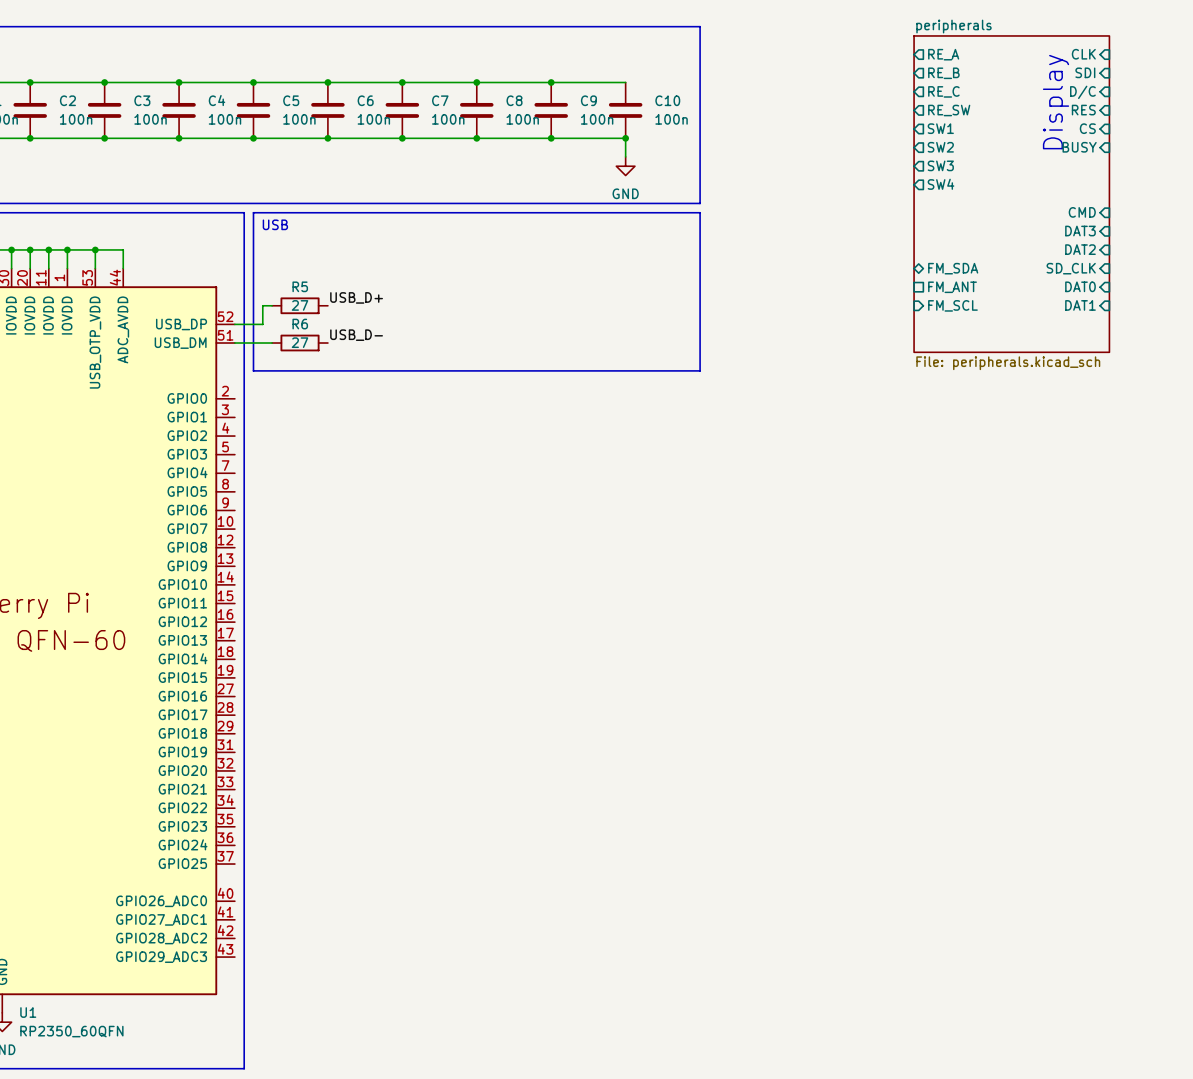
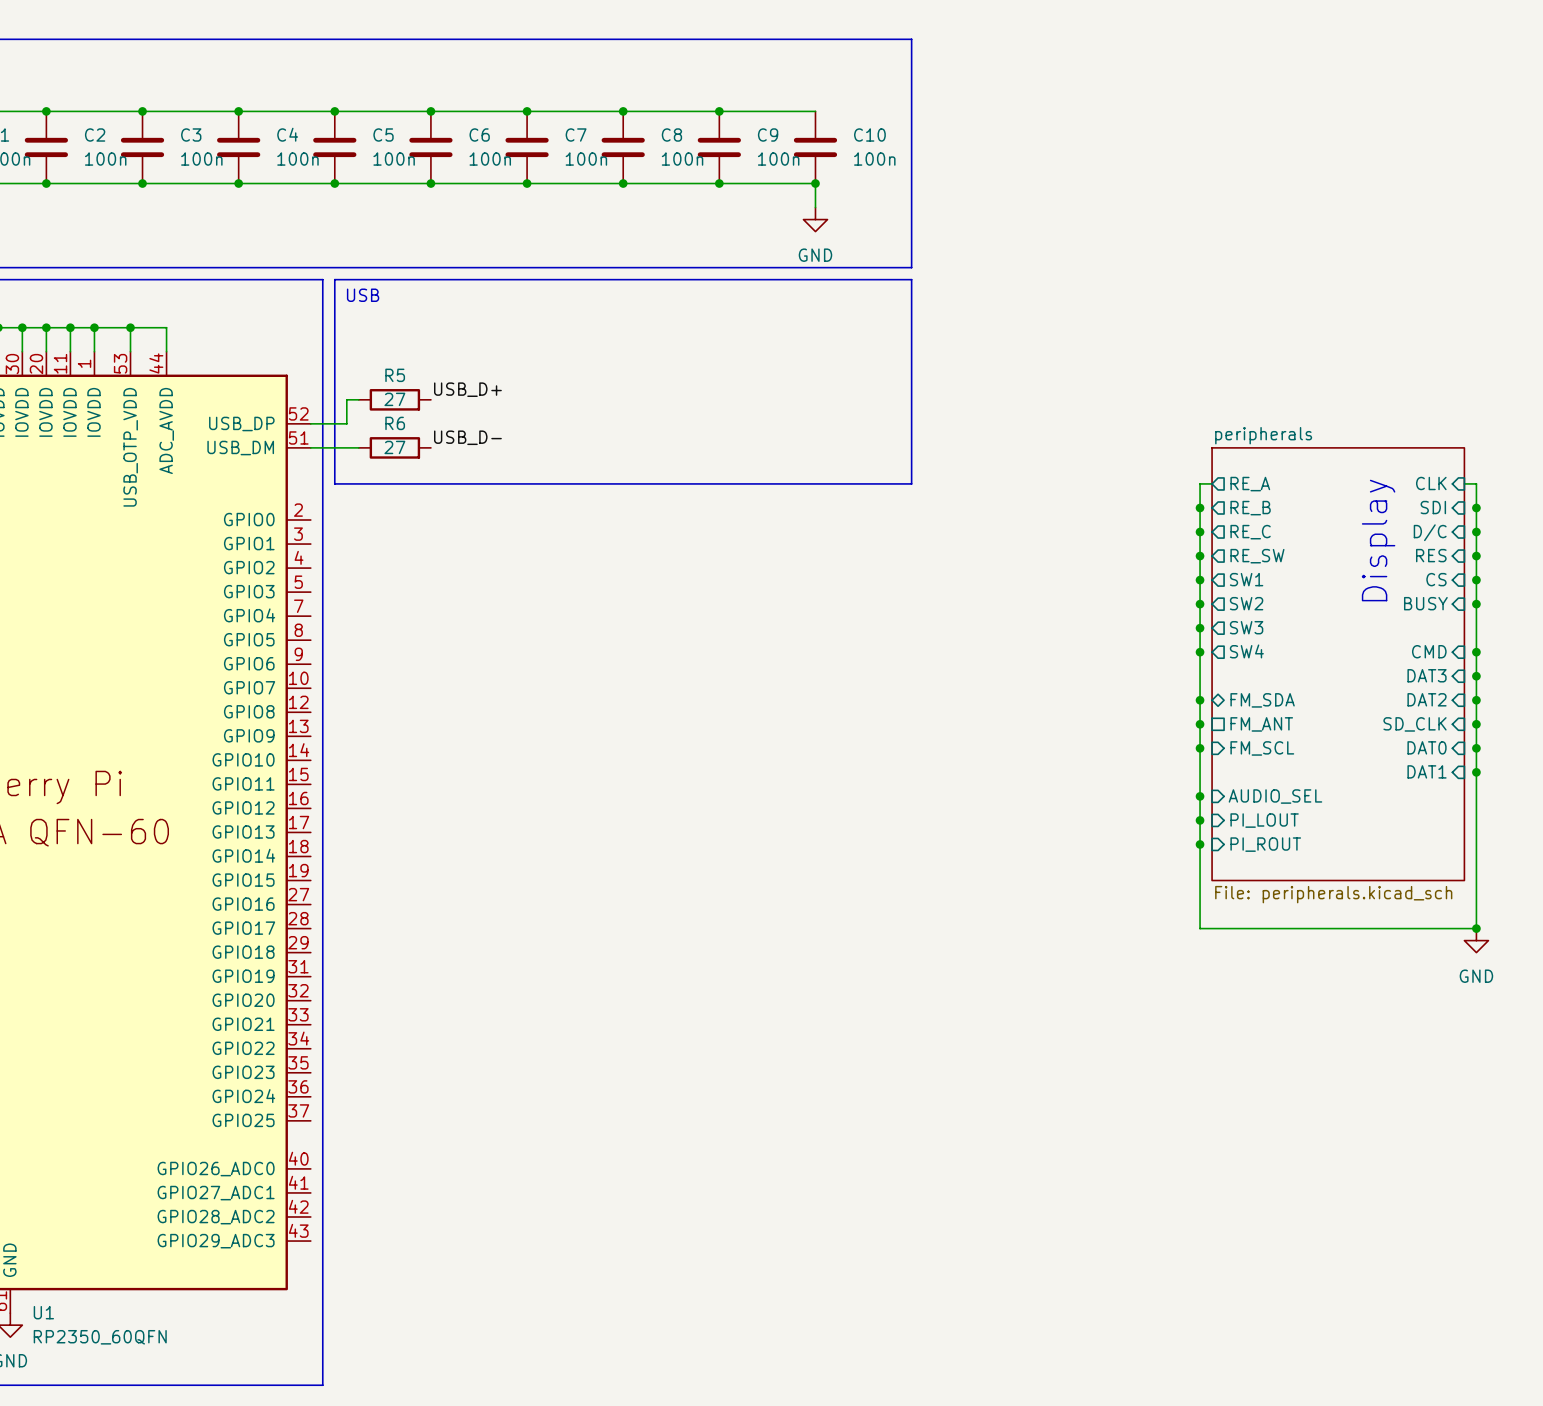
sheet pin: RE_A (943, 54) -> none
sheet pin: CLK (1083, 54) -> none
sheet pin: SDI (1085, 72) -> none
sheet pin: RE_B (943, 73) -> none
sheet pin: RE_C (943, 91) -> none
sheet pin: D/C (1082, 92) -> none
text: Display (1056, 102) -> none
sheet pin: RE_SW (949, 110) -> none
sheet pin: RES (1083, 110) -> none
sheet pin: SW1 (940, 128) -> none
sheet pin: CS (1087, 128) -> none
sheet pin: SW2 (940, 147) -> none
sheet pin: BUSY (1079, 147) -> none
sheet pin: SW3 (940, 165) -> none
sheet pin: SW4 (941, 184) -> none
sheet peripherals: File: peripherals.kicad_sch (1011, 194) -> none
sheet pin: CMD (1082, 212) -> none
sheet pin: DAT3 (1080, 231) -> none
sheet pin: DAT2 (1080, 249) -> none
sheet pin: FM_SDA (953, 268) -> none
sheet pin: SD_CLK (1071, 268) -> none
sheet pin: DAT0 (1080, 286) -> none
sheet pin: FM_ANT (952, 287) -> none
sheet pin: FM_SCL (952, 305) -> none
sheet pin: DAT1 (1080, 305) -> none
wire: none -> (1212, 483) (1200, 483) (1200, 928) (1476, 928) (1476, 483) (1464, 483)
sheet pin: none -> CLK (1431, 483)
sheet pin: none -> RE_A (1250, 484)
junction: none -> (1200, 507)
sheet pin: none -> RE_B (1250, 508)
sheet pin: none -> SDI (1433, 507)
junction: none -> (1476, 507)
junction: none -> (1200, 532)
sheet pin: none -> RE_C (1250, 532)
sheet pin: none -> D/C (1430, 532)
junction: none -> (1476, 532)
text: none -> Display (1378, 540)
junction: none -> (1200, 556)
sheet pin: none -> RE_SW (1257, 556)
sheet pin: none -> RES (1431, 555)
junction: none -> (1476, 556)
sheet pin: none -> SW1 (1246, 579)
sheet pin: none -> CS (1436, 579)
junction: none -> (1200, 580)
junction: none -> (1476, 580)
junction: none -> (1200, 604)
sheet pin: none -> SW2 (1246, 603)
sheet pin: none -> BUSY (1425, 603)
junction: none -> (1476, 604)
junction: none -> (1200, 628)
sheet pin: none -> SW3 (1246, 627)
sheet pin: none -> SW4 (1246, 651)
sheet pin: none -> CMD (1429, 651)
junction: none -> (1200, 652)
junction: none -> (1476, 652)
sheet peripherals: none -> File: peripherals.kicad_sch (1338, 664)
sheet pin: none -> DAT3 (1427, 675)
junction: none -> (1476, 676)
junction: none -> (1200, 700)
sheet pin: none -> FM_SDA (1262, 700)
sheet pin: none -> DAT2 (1427, 699)
junction: none -> (1476, 700)
junction: none -> (1200, 724)
junction: none -> (1476, 724)
sheet pin: none -> FM_ANT (1261, 724)
sheet pin: none -> SD_CLK (1415, 724)
junction: none -> (1200, 748)
sheet pin: none -> FM_SCL (1262, 748)
sheet pin: none -> DAT0 (1427, 747)
junction: none -> (1476, 748)
sheet pin: none -> DAT1 (1427, 771)
junction: none -> (1476, 772)
junction: none -> (1200, 796)
sheet pin: none -> AUDIO_SEL (1275, 796)
junction: none -> (1200, 820)
sheet pin: none -> PI_LOUT (1264, 820)
junction: none -> (1200, 844)
sheet pin: none -> PI_ROUT (1265, 844)
junction: none -> (1476, 928)
power symbol: none -> GND (1476, 940)

